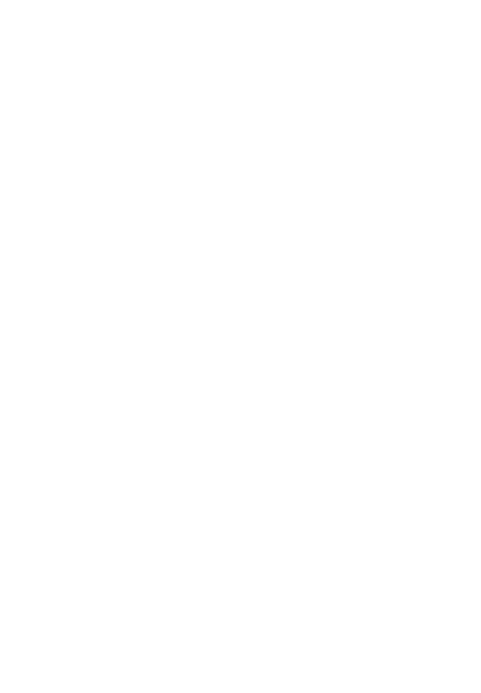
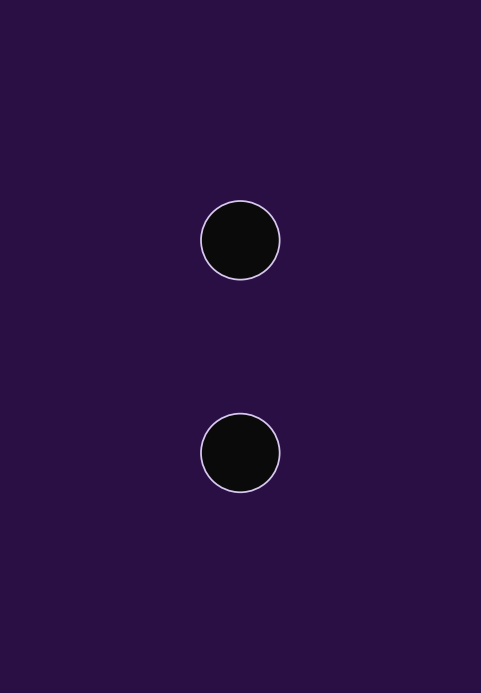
part: none -> (240, 240)
part: none -> (240, 452)

